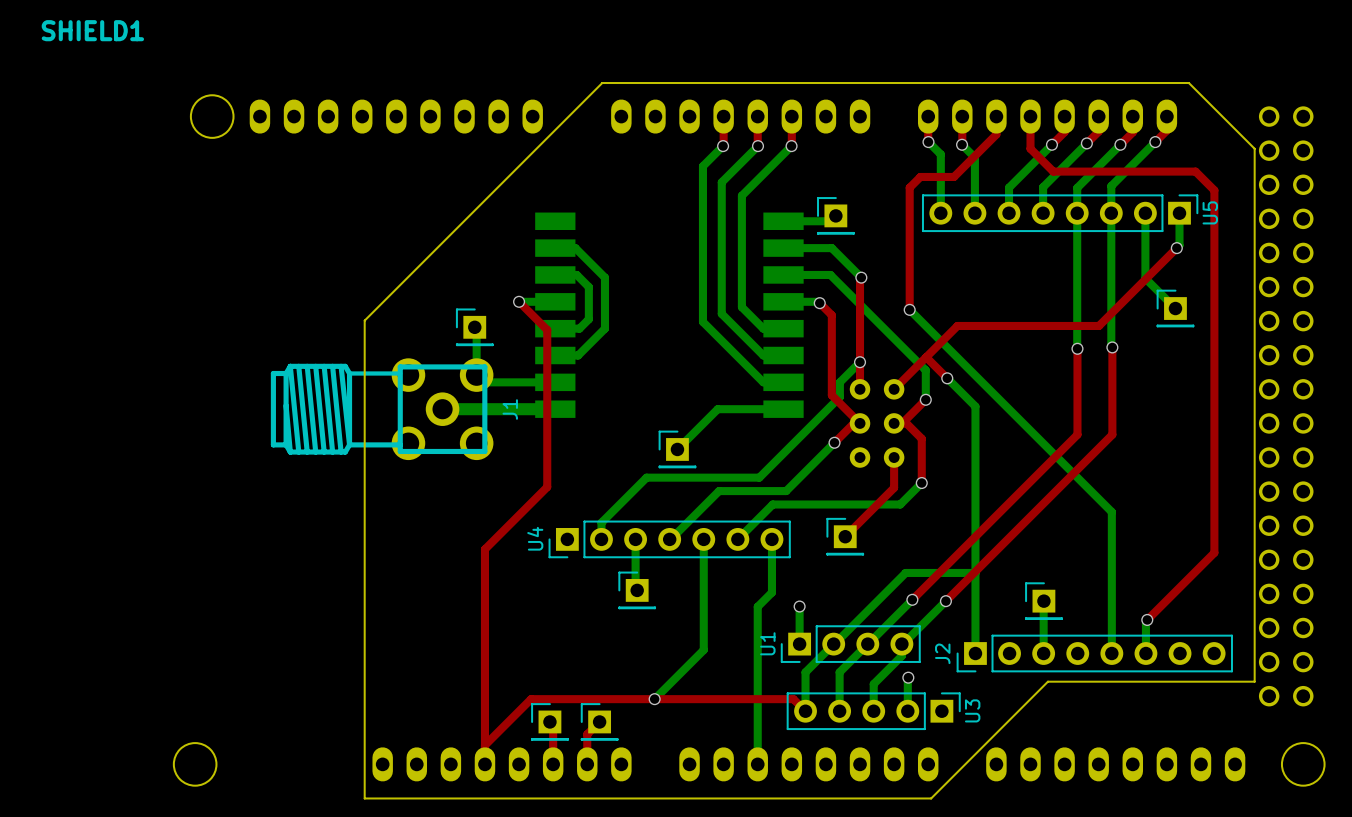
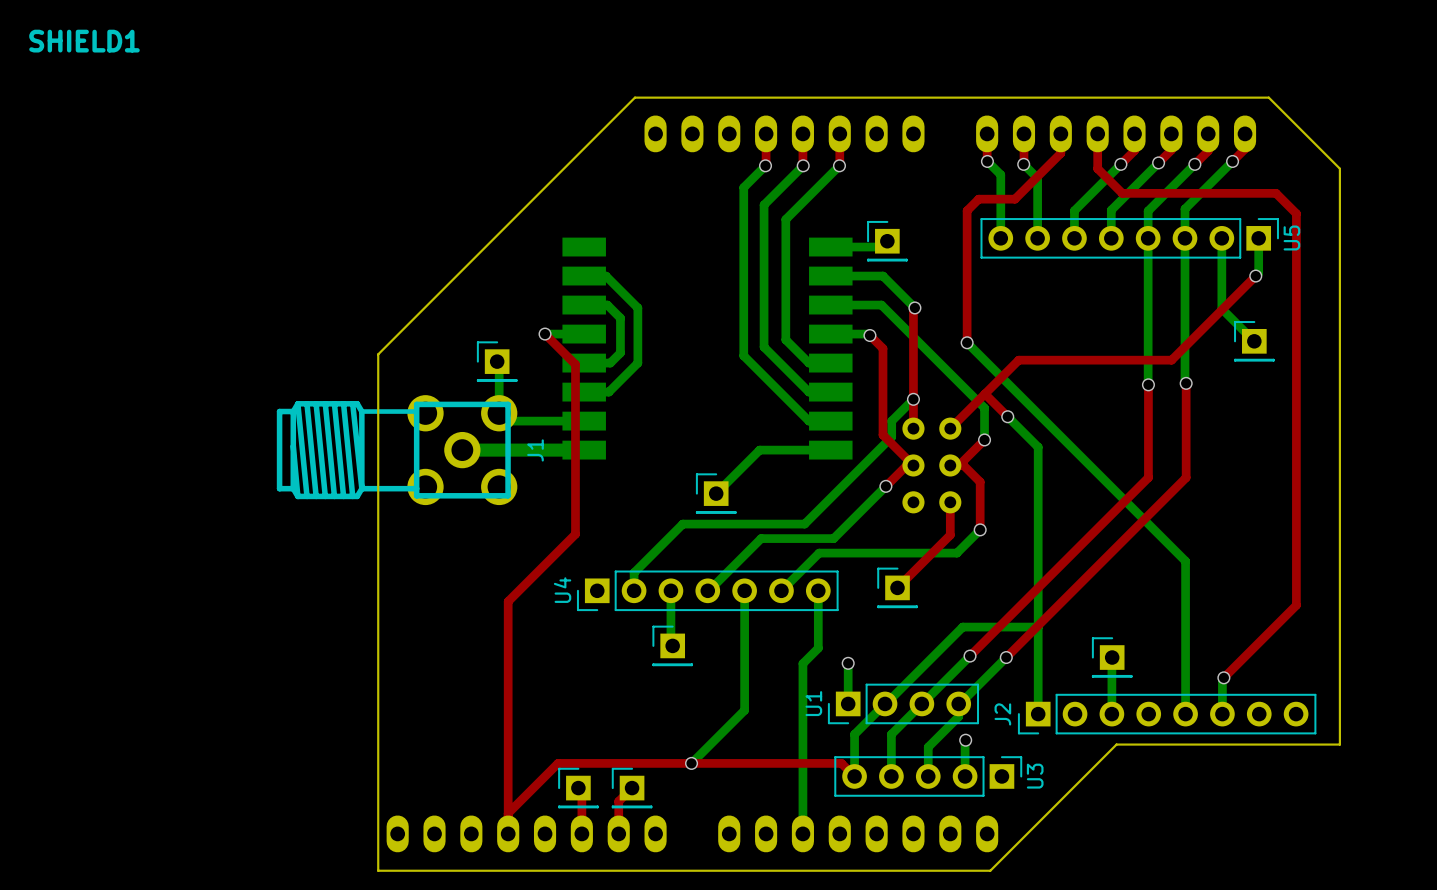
SHIELD1 footprint: [173, 95, 1325, 786] -> [386, 115, 1257, 853]

